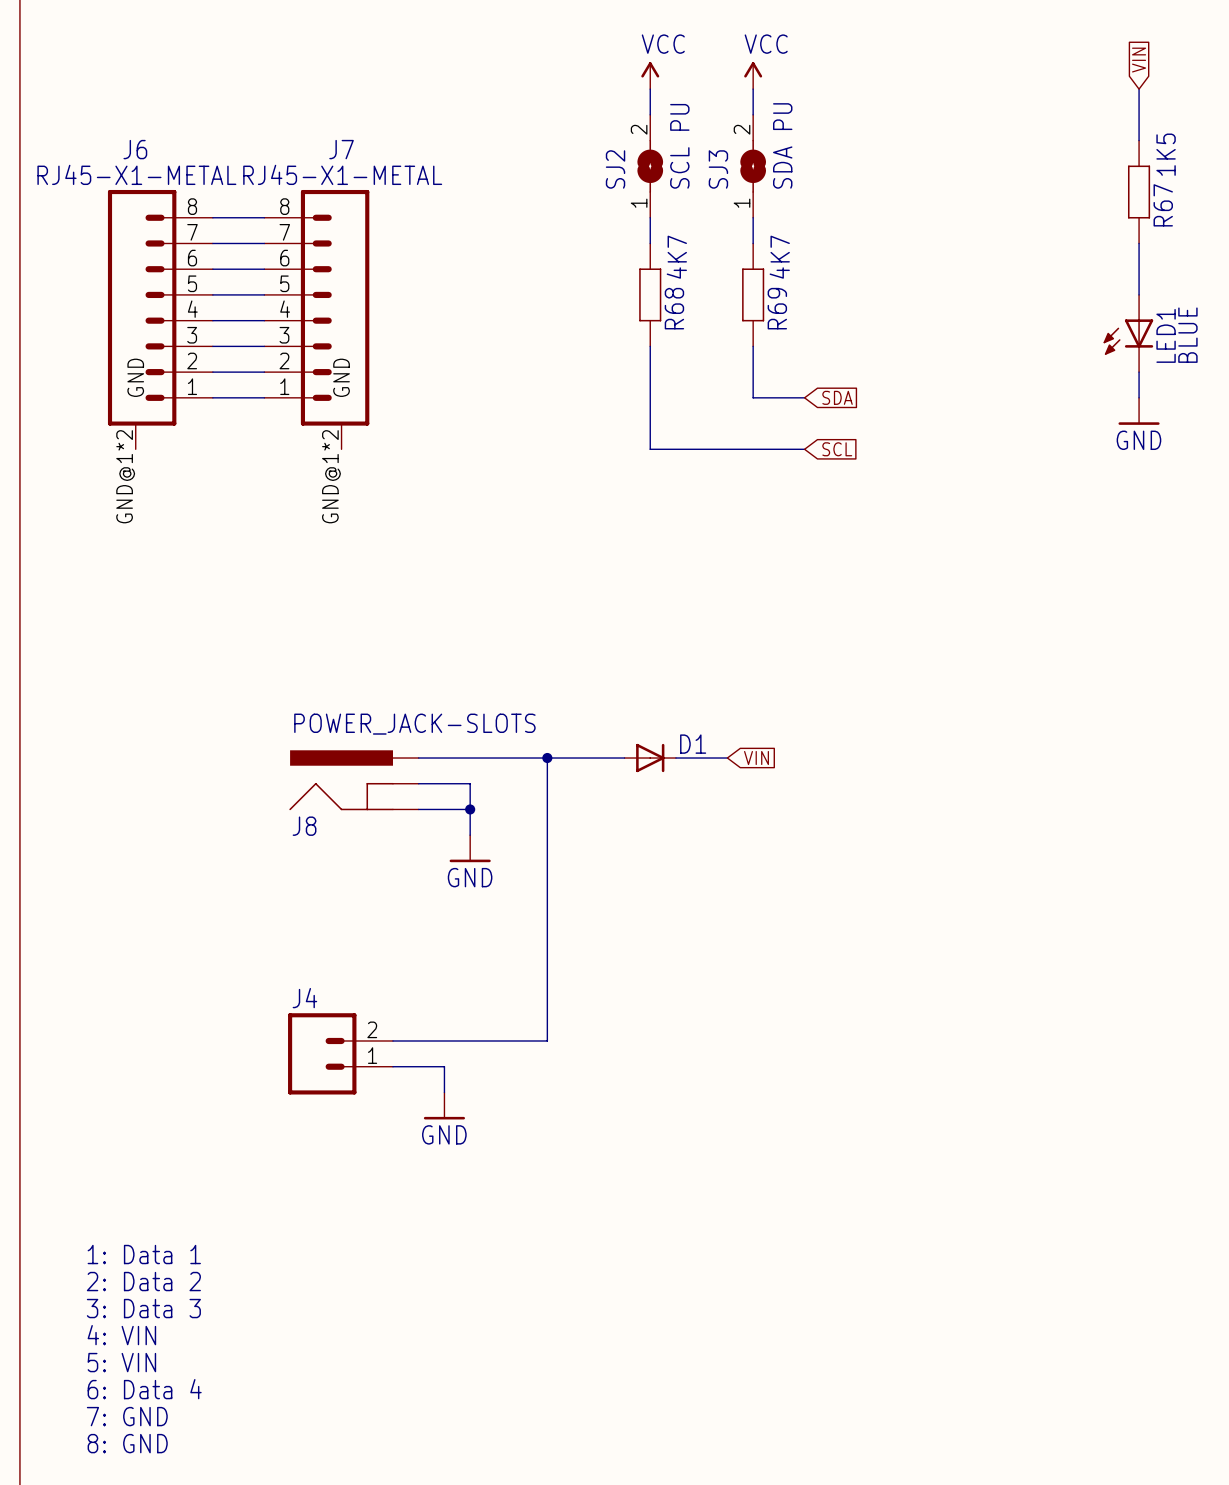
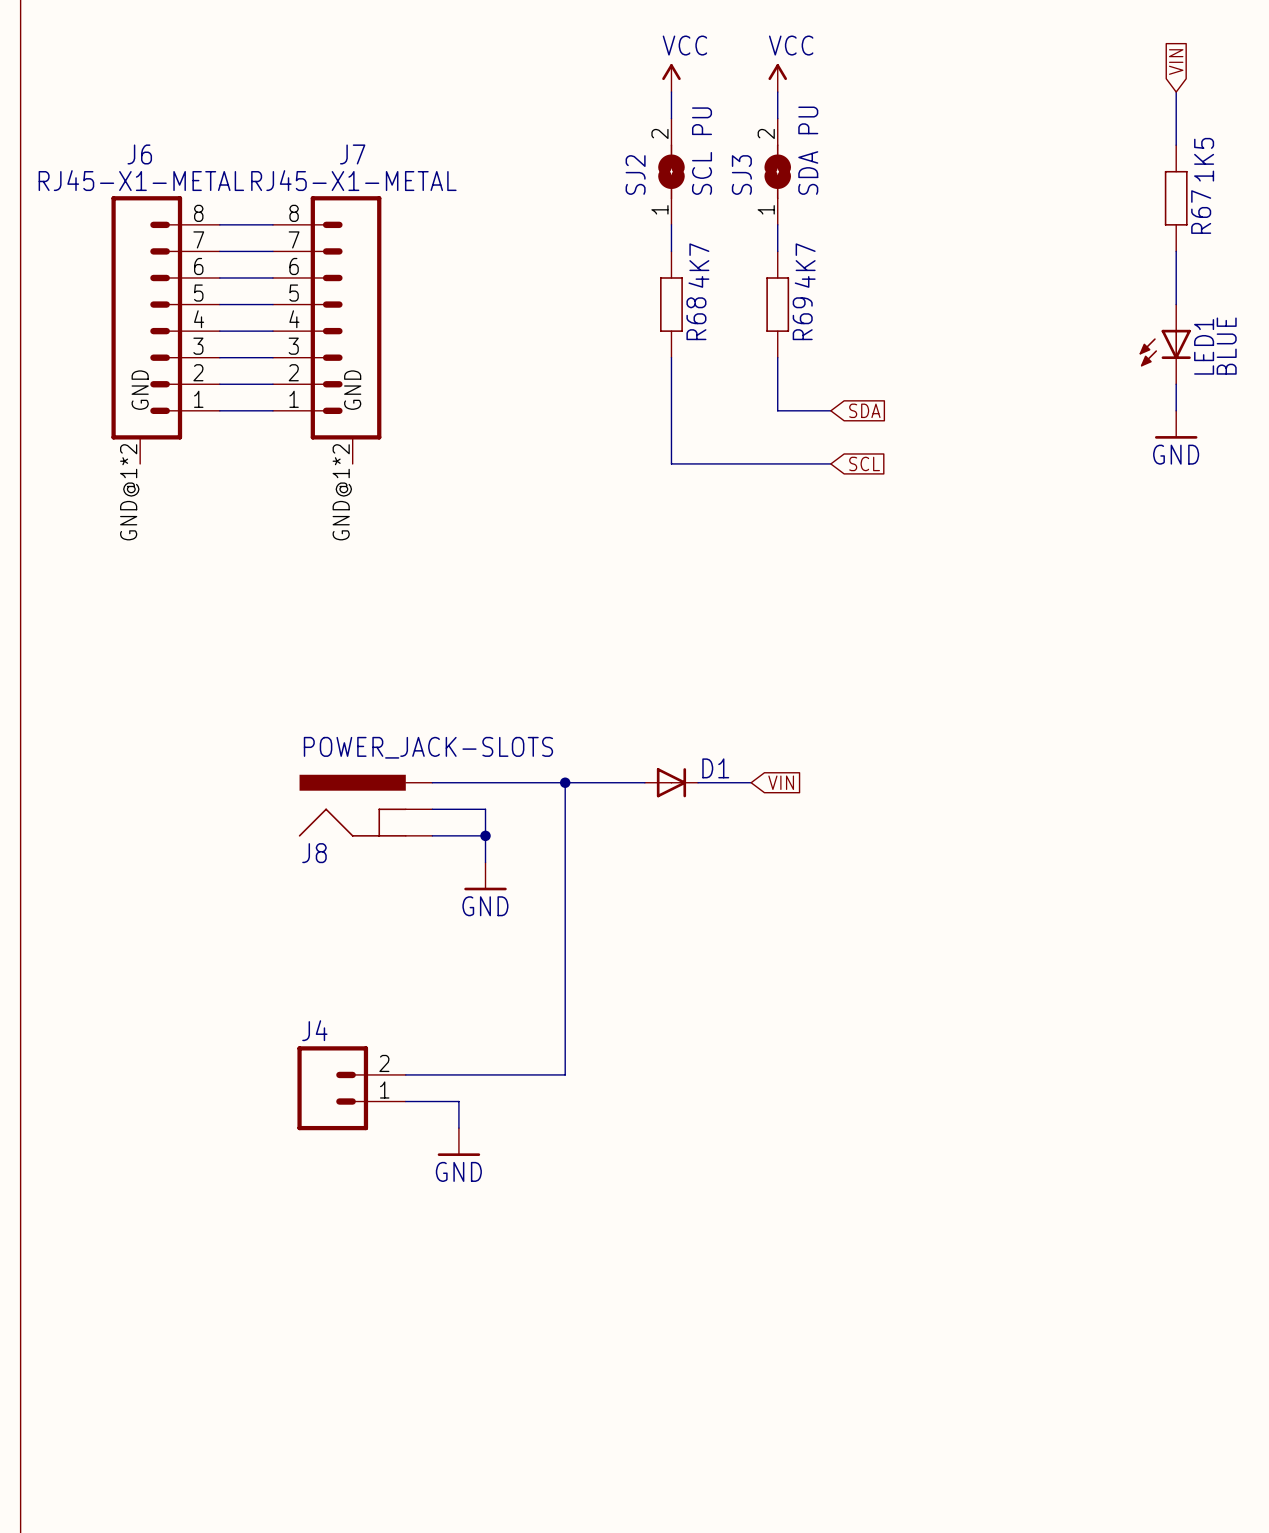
text: 1: Data 1 (144, 1254) -> none
text: 2: Data 2 (143, 1281) -> none
text: 3: Data 3 (143, 1308) -> none
text: 4: VIN (121, 1335) -> none
text: 5: VIN (121, 1362) -> none
text: 6: Data 4 (144, 1389) -> none
text: 7: GND (127, 1416) -> none
text: 8: GND (127, 1443) -> none

